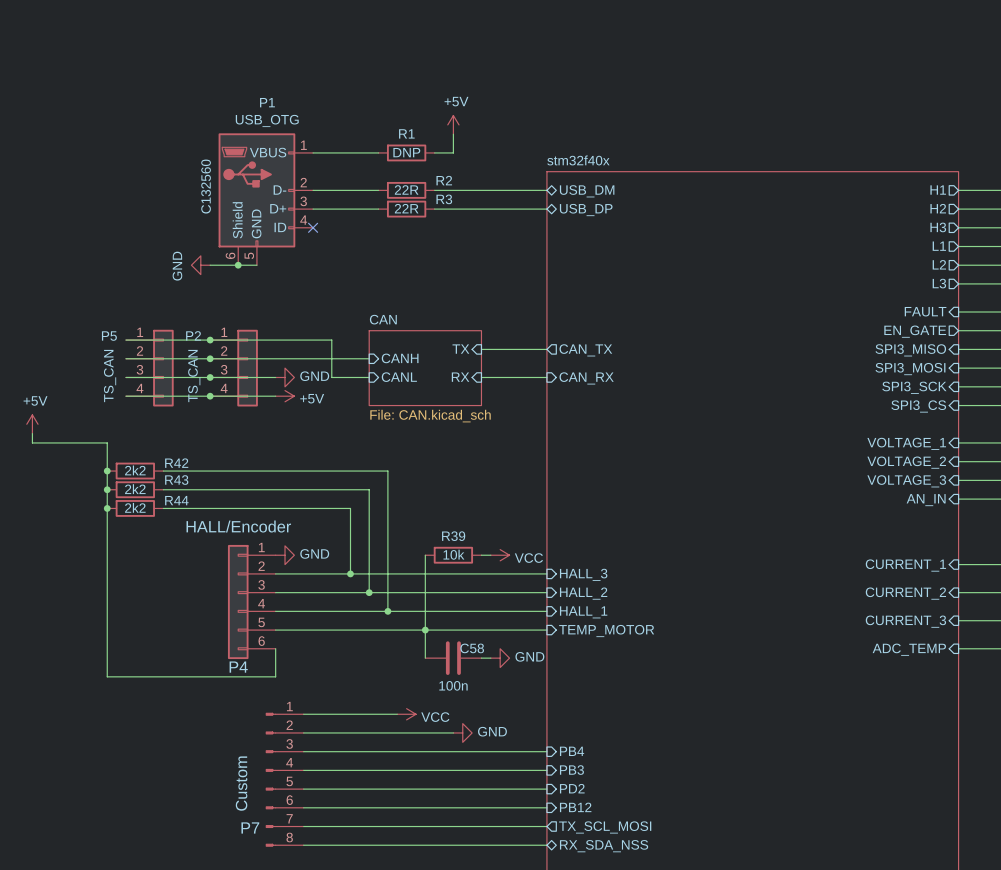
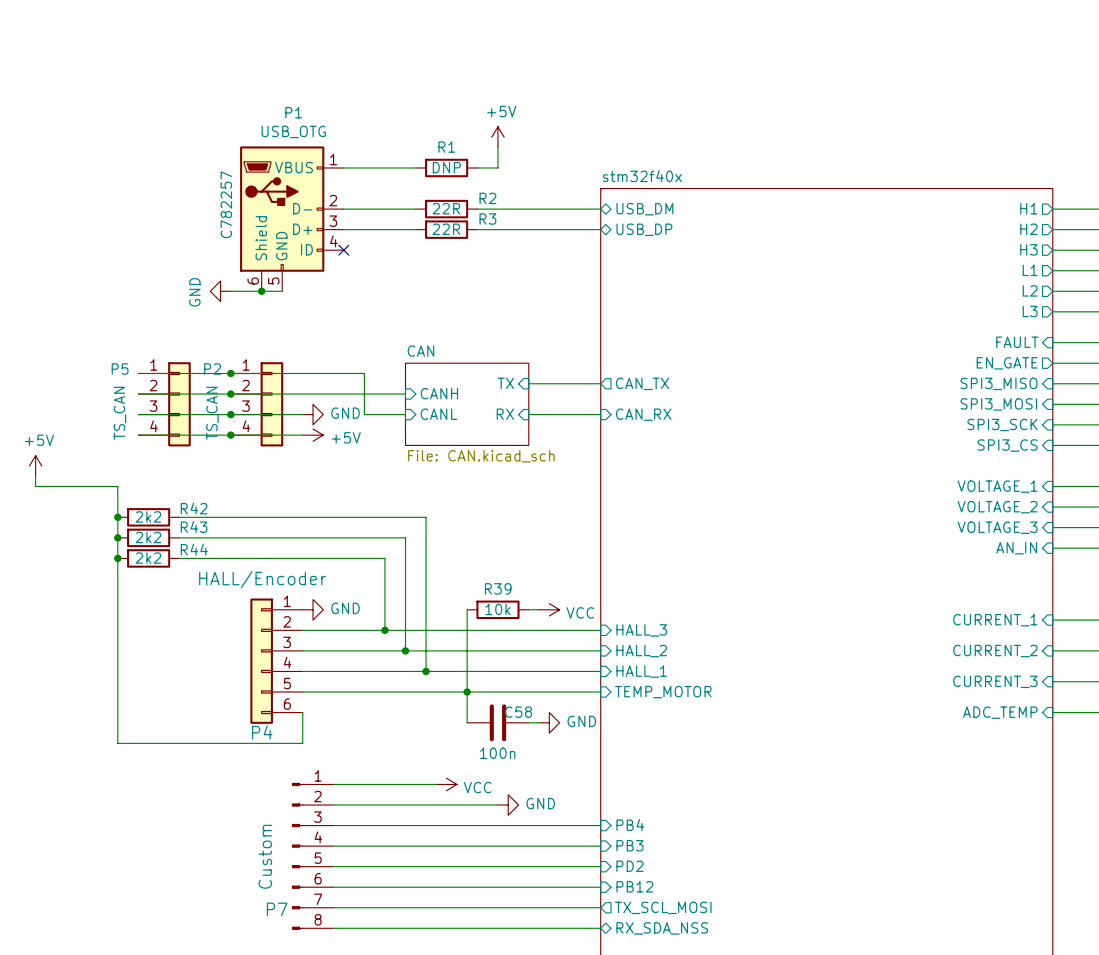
P1 text: C132560 (206, 186) -> C782257 (226, 204)

